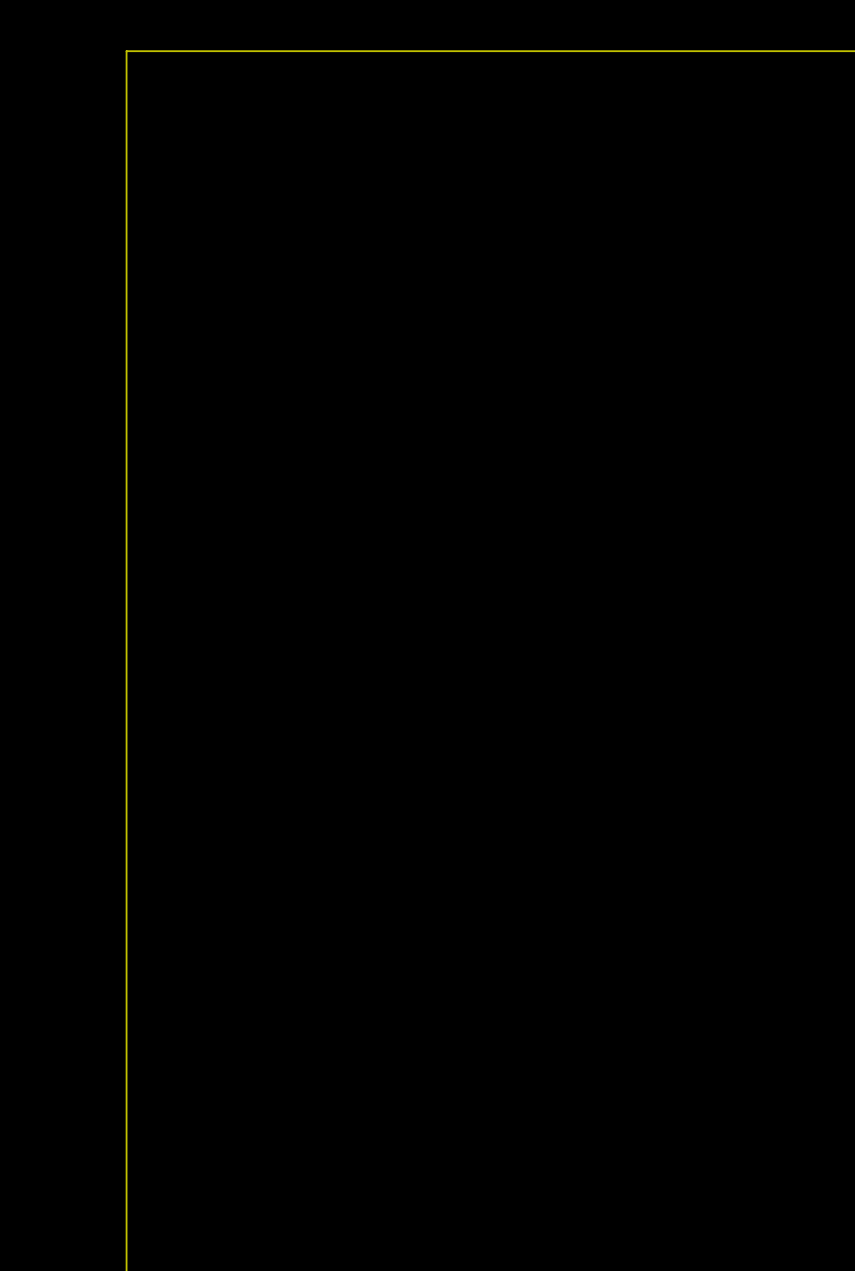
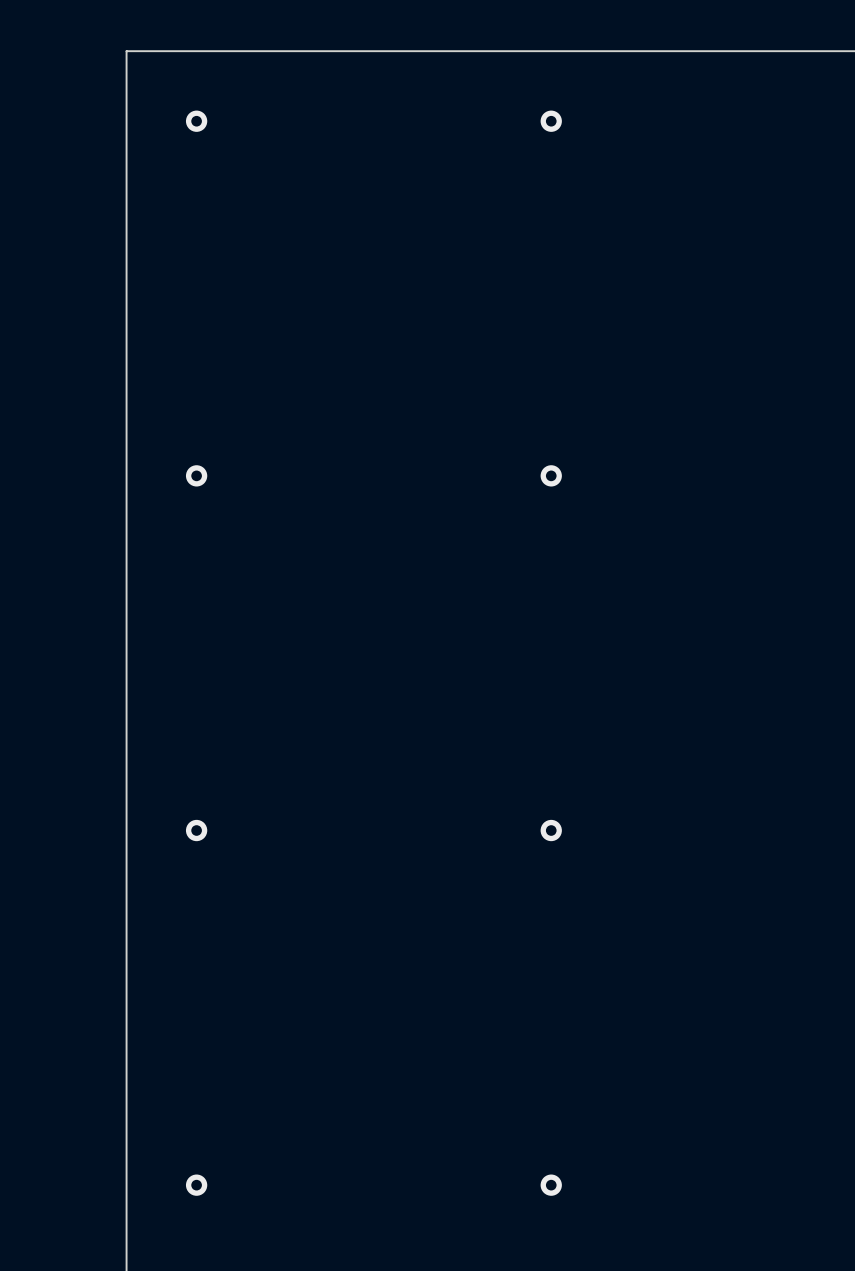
via: none -> (196, 121)
via: none -> (551, 121)
via: none -> (196, 475)
via: none -> (551, 475)
via: none -> (196, 830)
via: none -> (551, 830)
via: none -> (196, 1185)
via: none -> (551, 1185)

